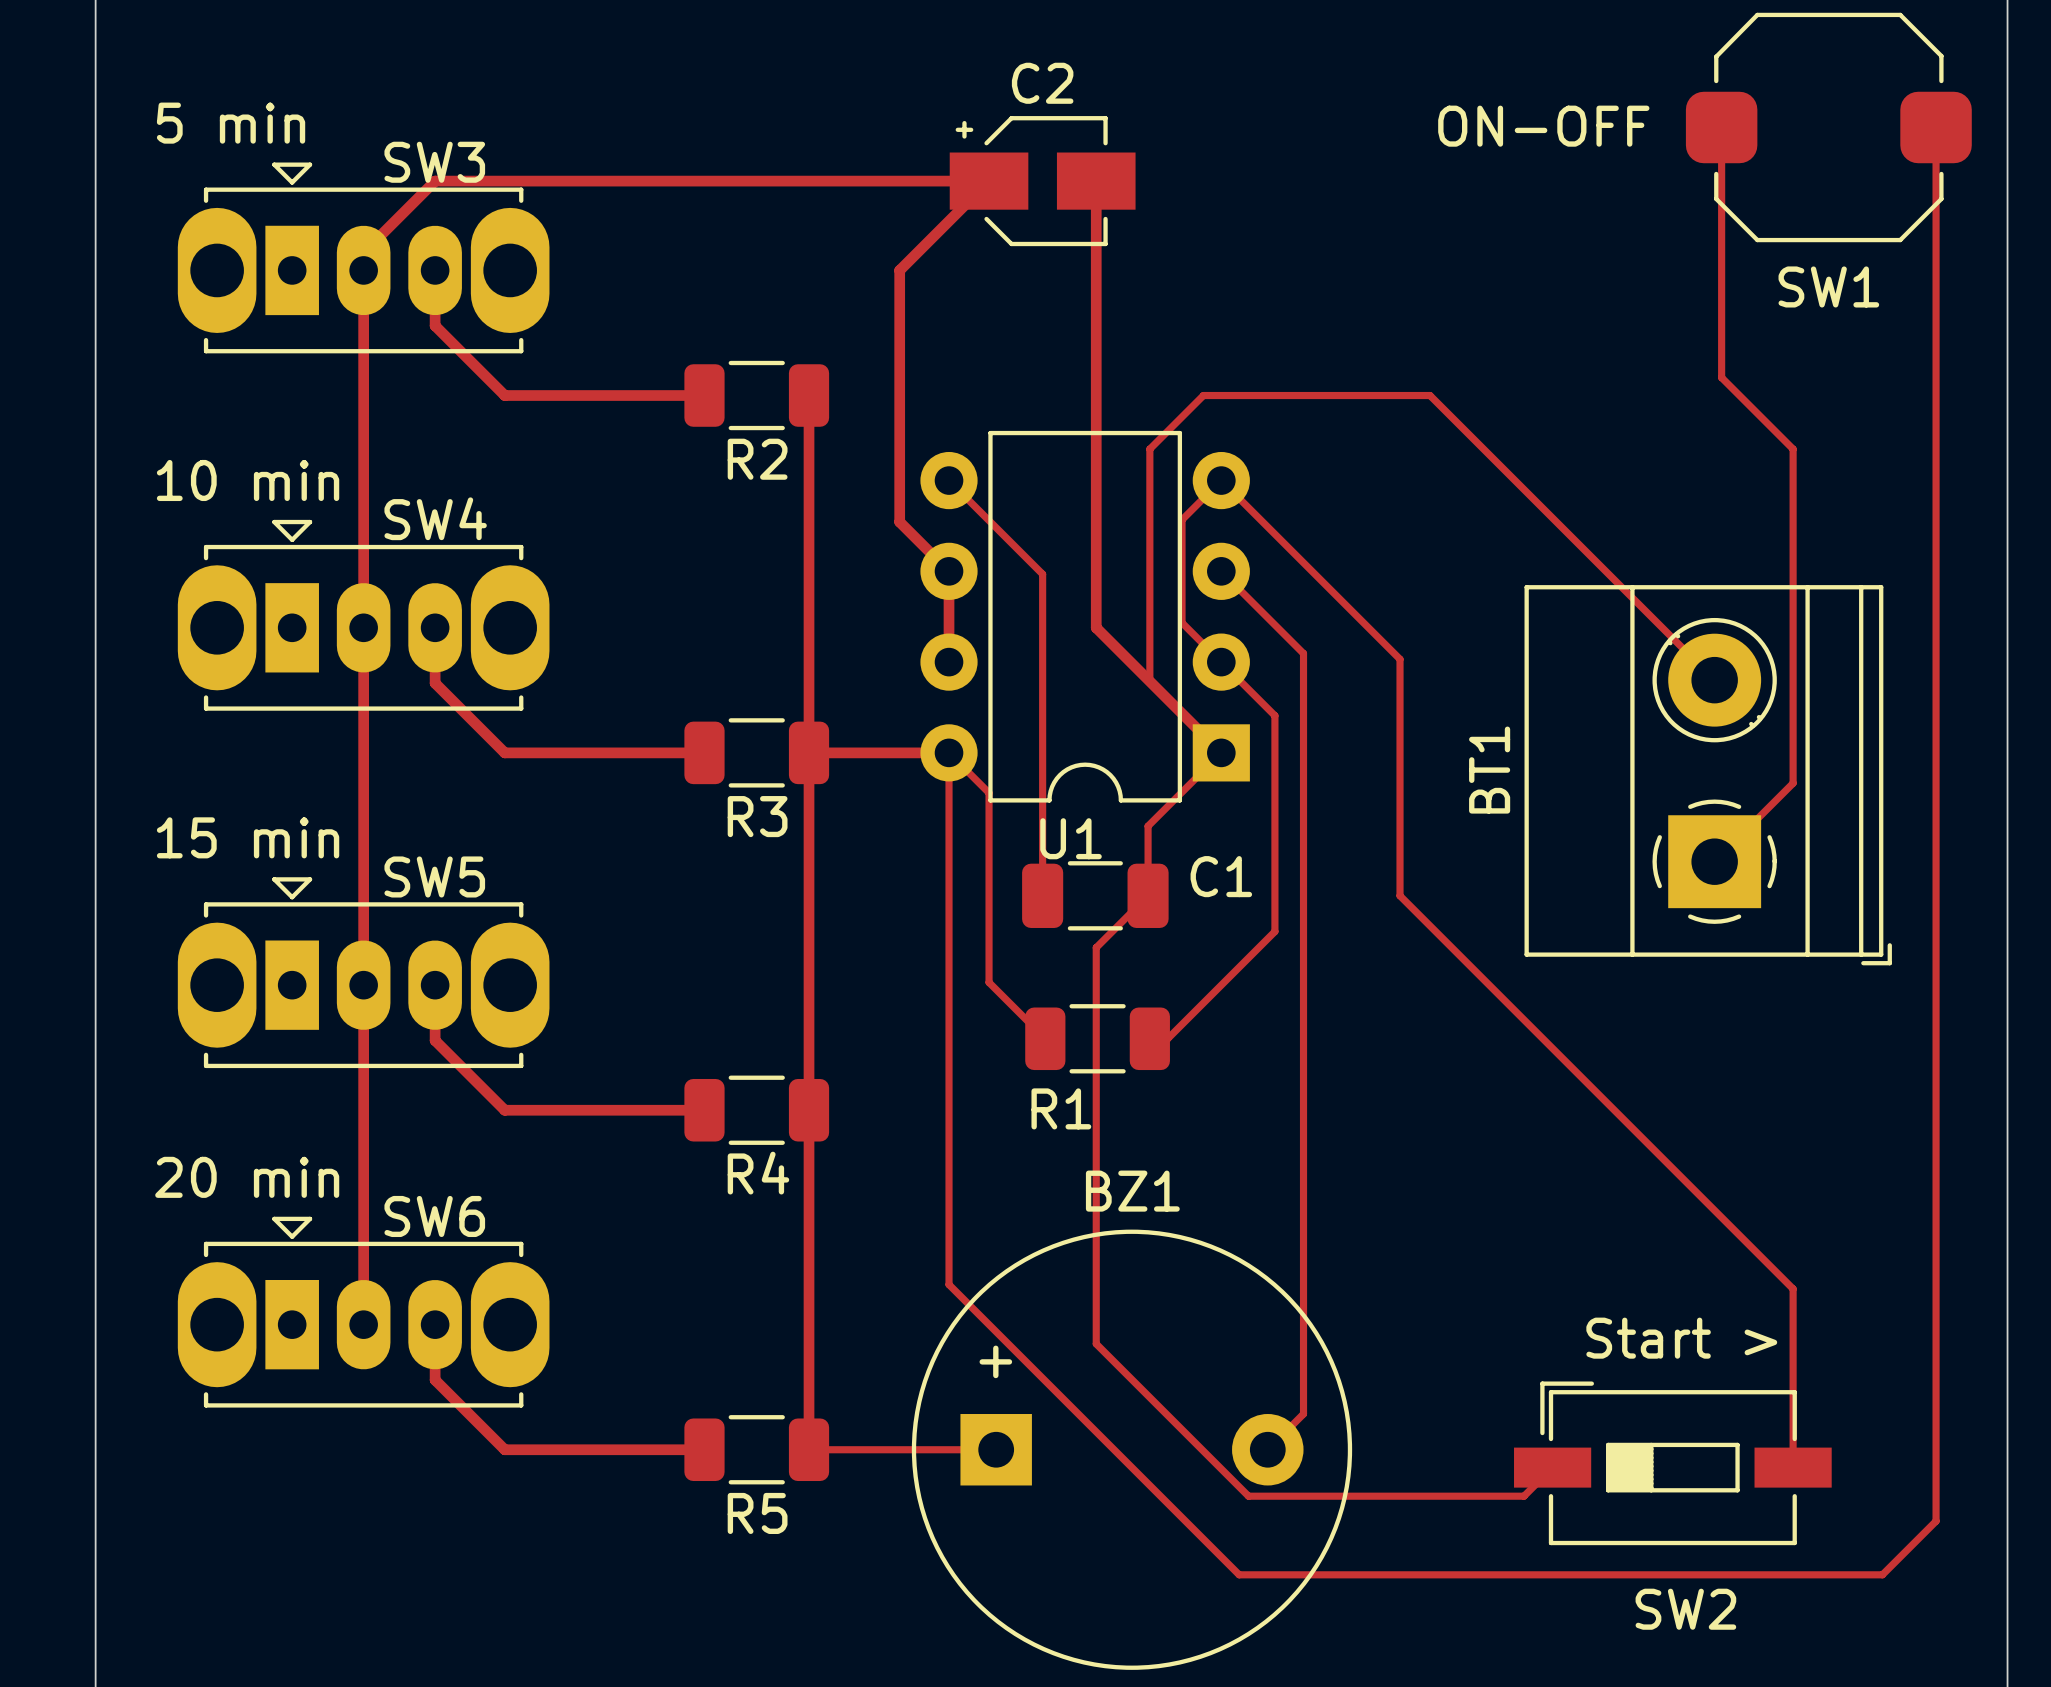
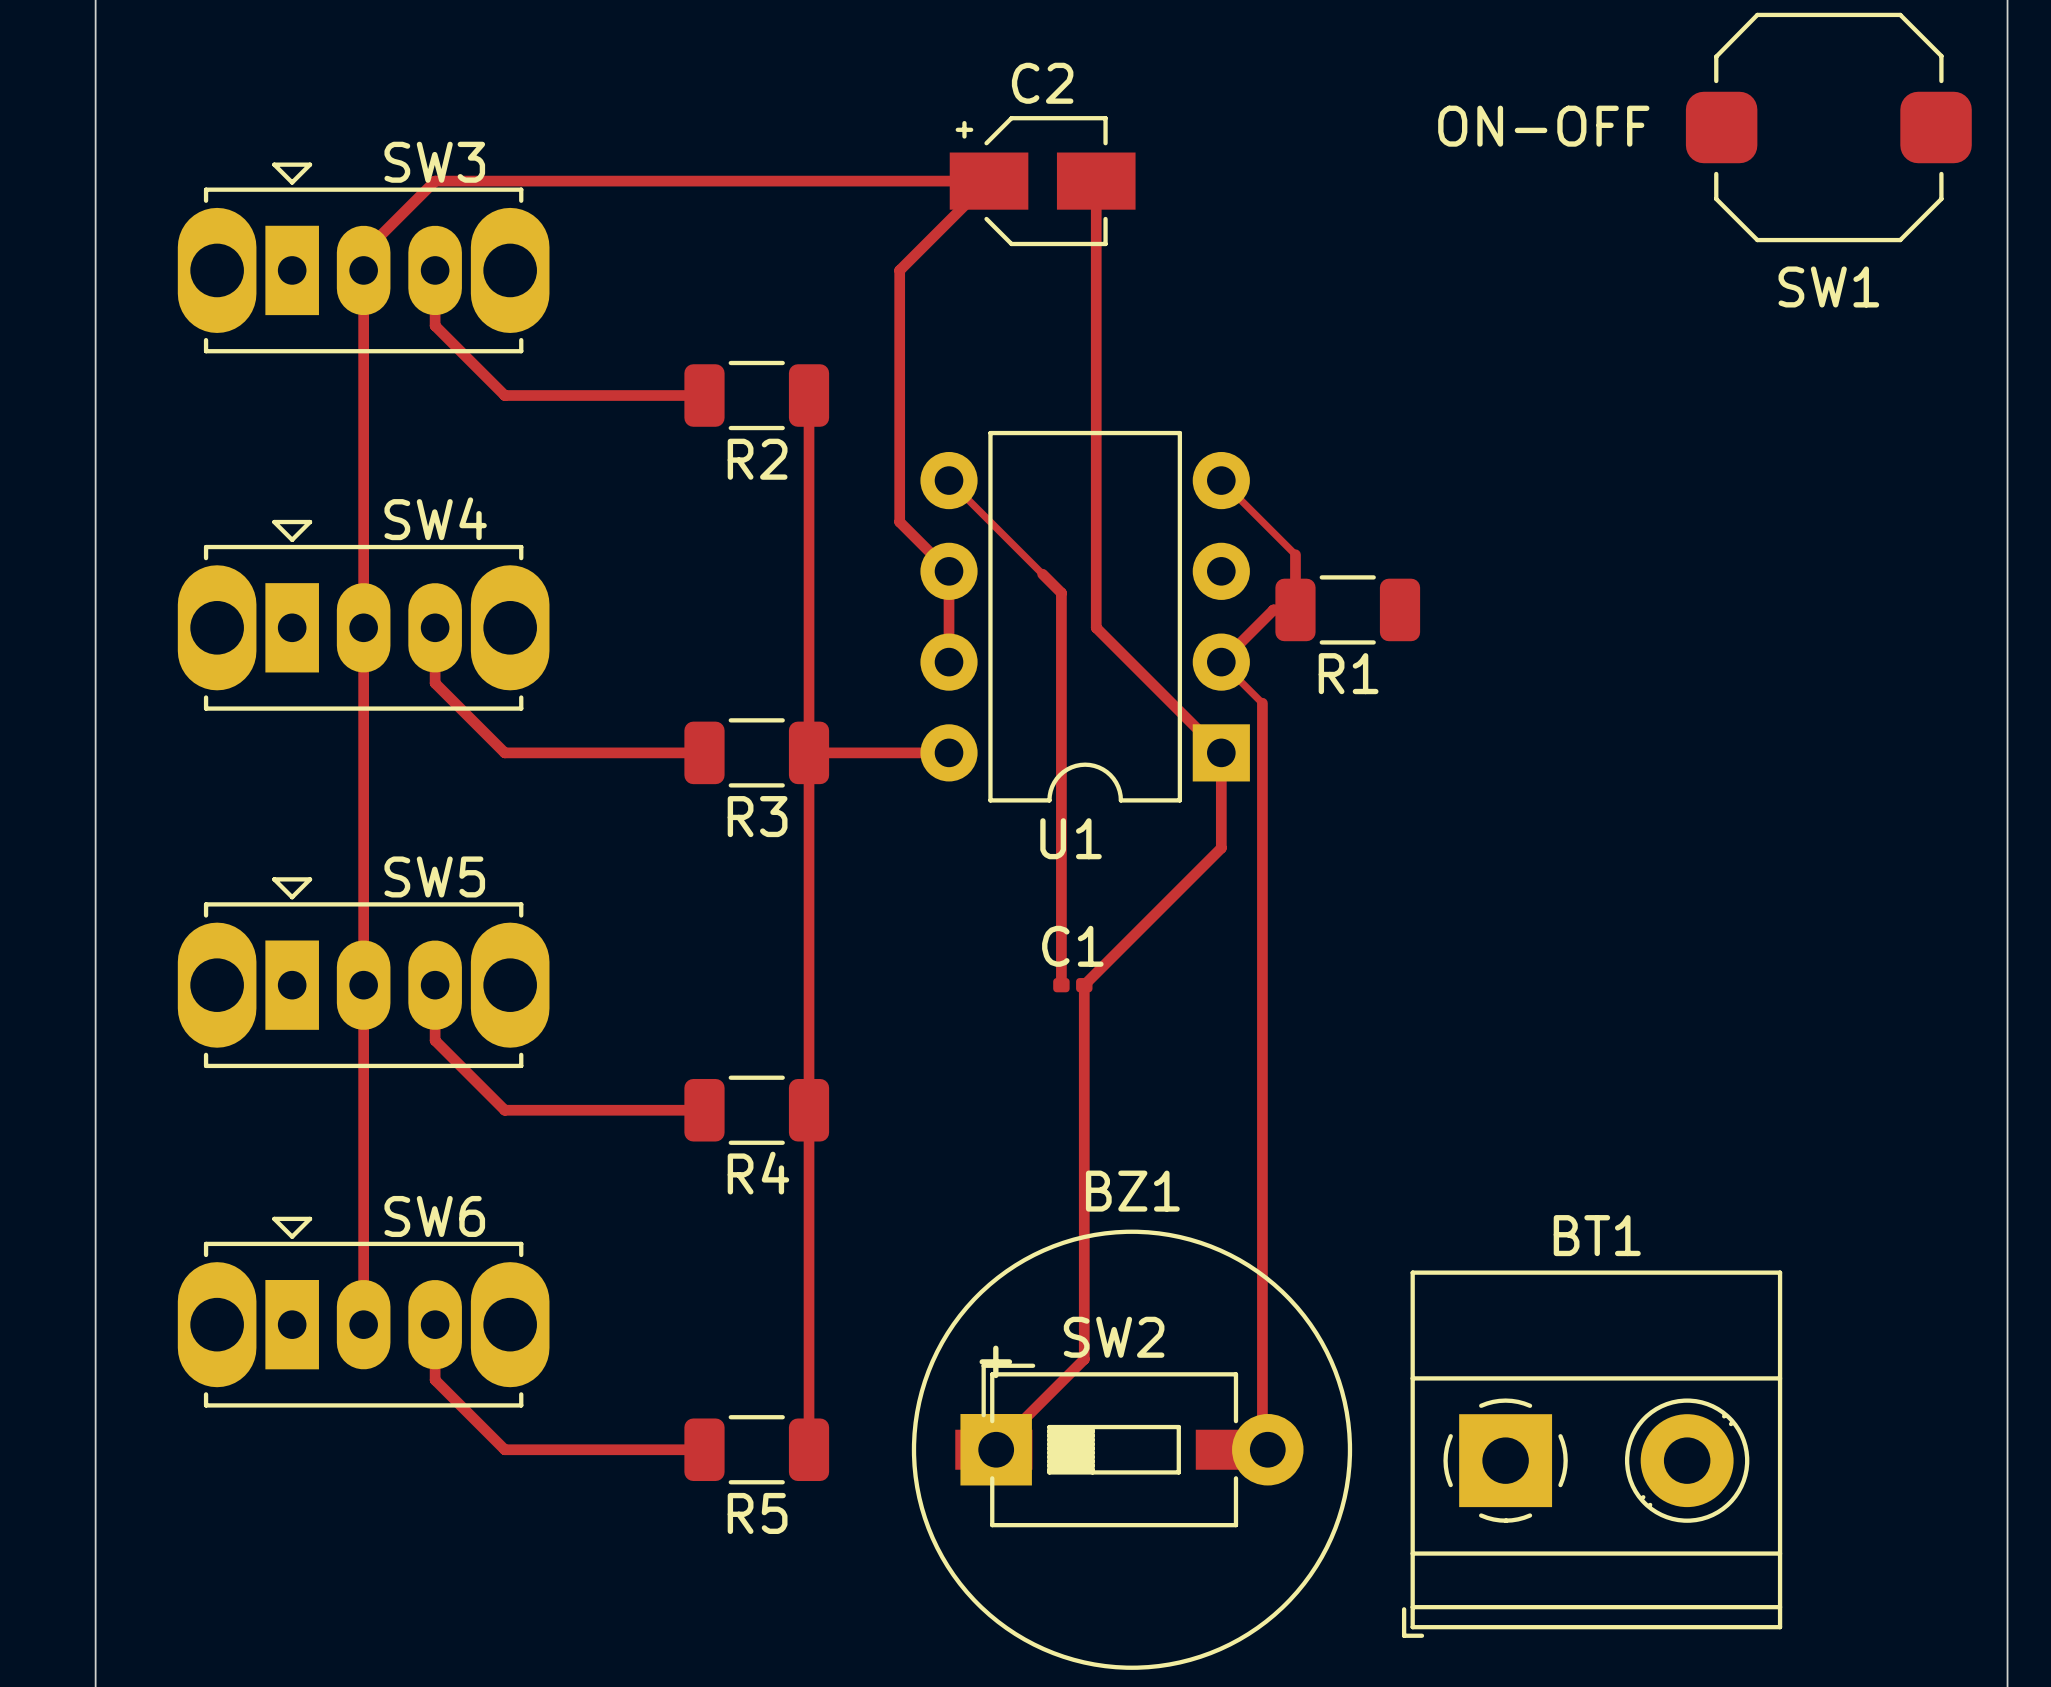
text: 5 min (231, 123) -> none
track: (1721, 127) (1721, 377) (1793, 449) (1793, 783) (1714, 861) -> none
track: (1936, 127) (1936, 1521) (1882, 1574) (1239, 1574) (949, 1284) (949, 752) (989, 792) (989, 982) (1045, 1038) -> none
text: 10 min (248, 480) -> none
track: (1221, 480) (1182, 519) (1182, 622) (1221, 662) -> (1295, 554) (1295, 609) (1273, 609) (1221, 662)
track: (1295, 554) (1400, 659) (1400, 895) (1793, 1288) (1793, 1467) -> none
track: (1221, 571) (1303, 653) (1303, 1414) (1267, 1449) -> none
track: (1042, 574) (1042, 895) -> (1042, 574) (1061, 592) (1061, 985)
track: (1714, 680) (1430, 395) (1203, 395) (1149, 449) (1149, 681) (1221, 752) (1148, 826) (1148, 895) (1096, 947) (1096, 1343) (1248, 1496) (1524, 1496) (1552, 1467) -> none
track: (1262, 703) (1274, 715) (1274, 931) (1167, 1038) (1149, 1038) -> (1262, 703) (1262, 1421) (1234, 1449)
track: none -> (1221, 752) (1221, 848) (1084, 985) (1084, 1359) (993, 1449)
BT1 rotation: 0° (1708, 775) -> 90° clockwise (1592, 1454)
BT1 position: (1708, 775) -> (1592, 1454)
text: 15 min (248, 837) -> none
C1 footprint: [1022, 861, 1169, 931] -> [1053, 978, 1093, 993]
C1 name position: C1 (1221, 876) -> C1 (1072, 946)
R1 position: (1097, 1038) -> (1347, 609)
R1 name position: R1 (1061, 1108) -> R1 (1348, 673)
text: 20 min (247, 1177) -> none
text: Start > (1681, 1338) -> none
track: (809, 1449) (996, 1449) -> none
SW2 position: (1672, 1463) -> (1114, 1445)
SW2 name position: SW2 (1685, 1609) -> SW2 (1114, 1337)

